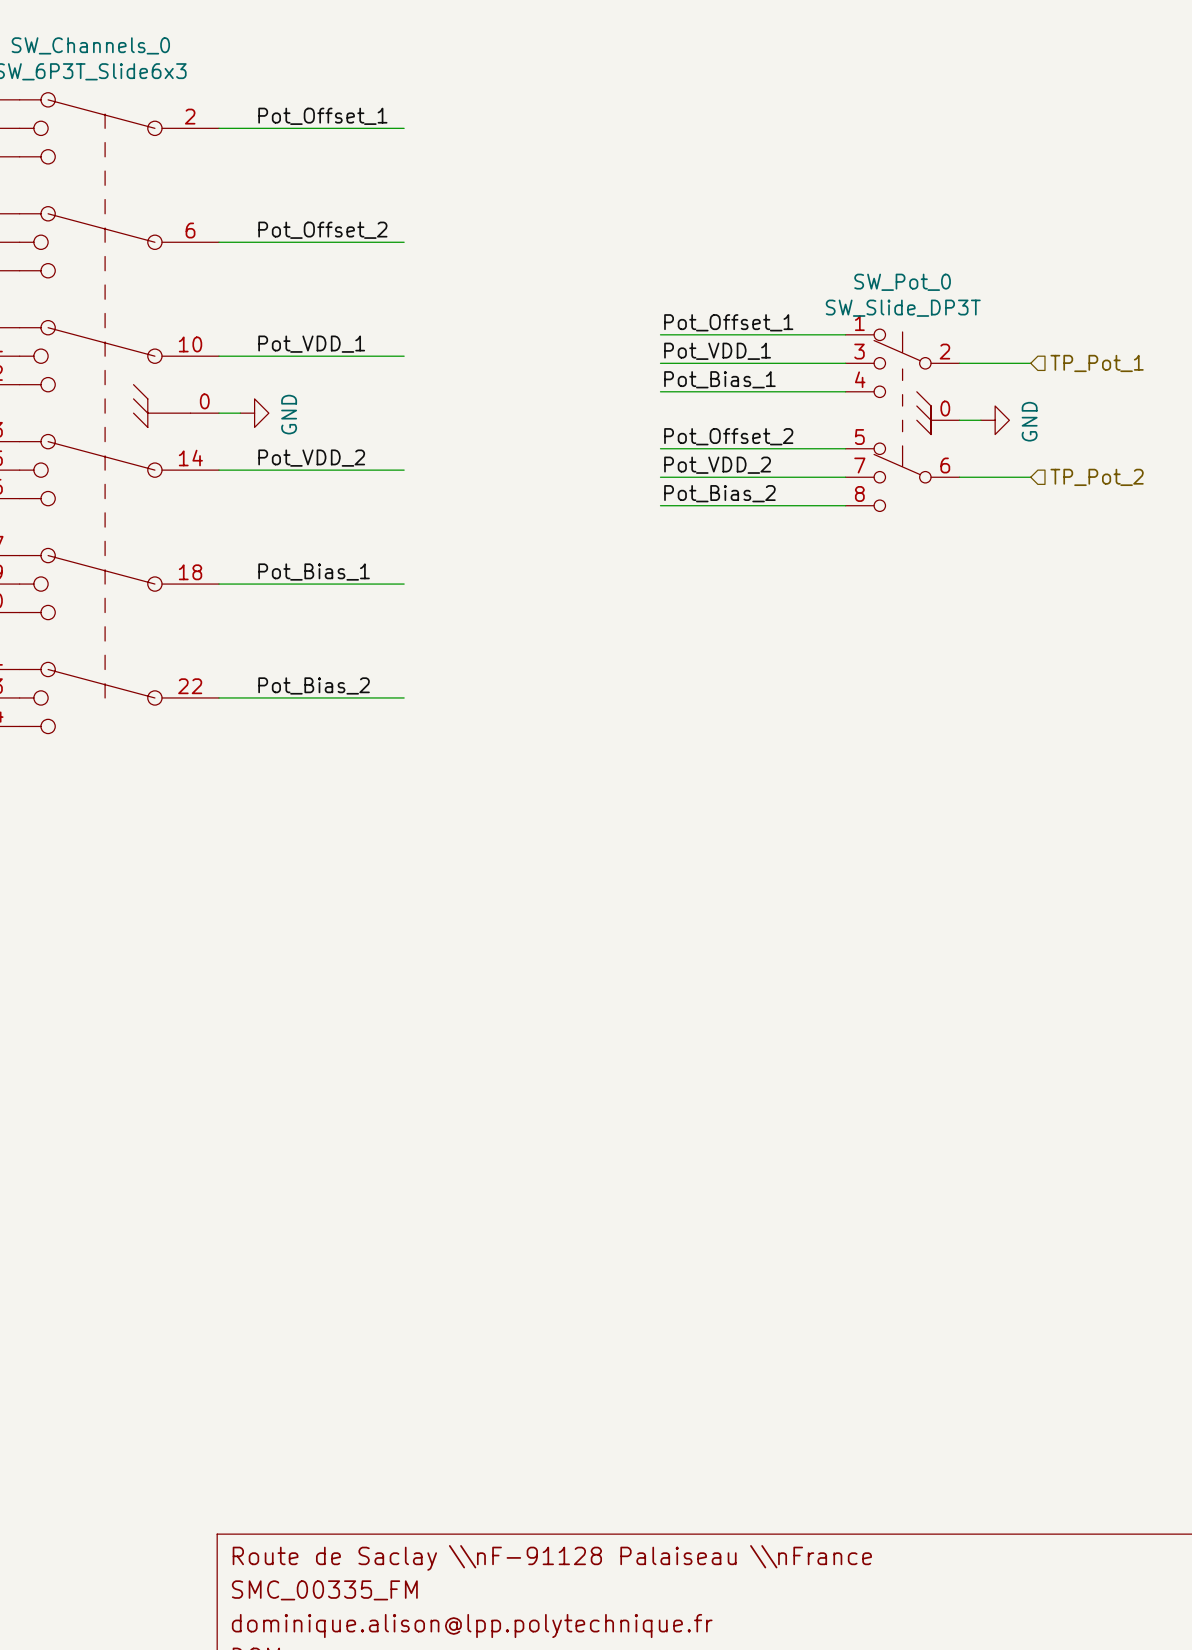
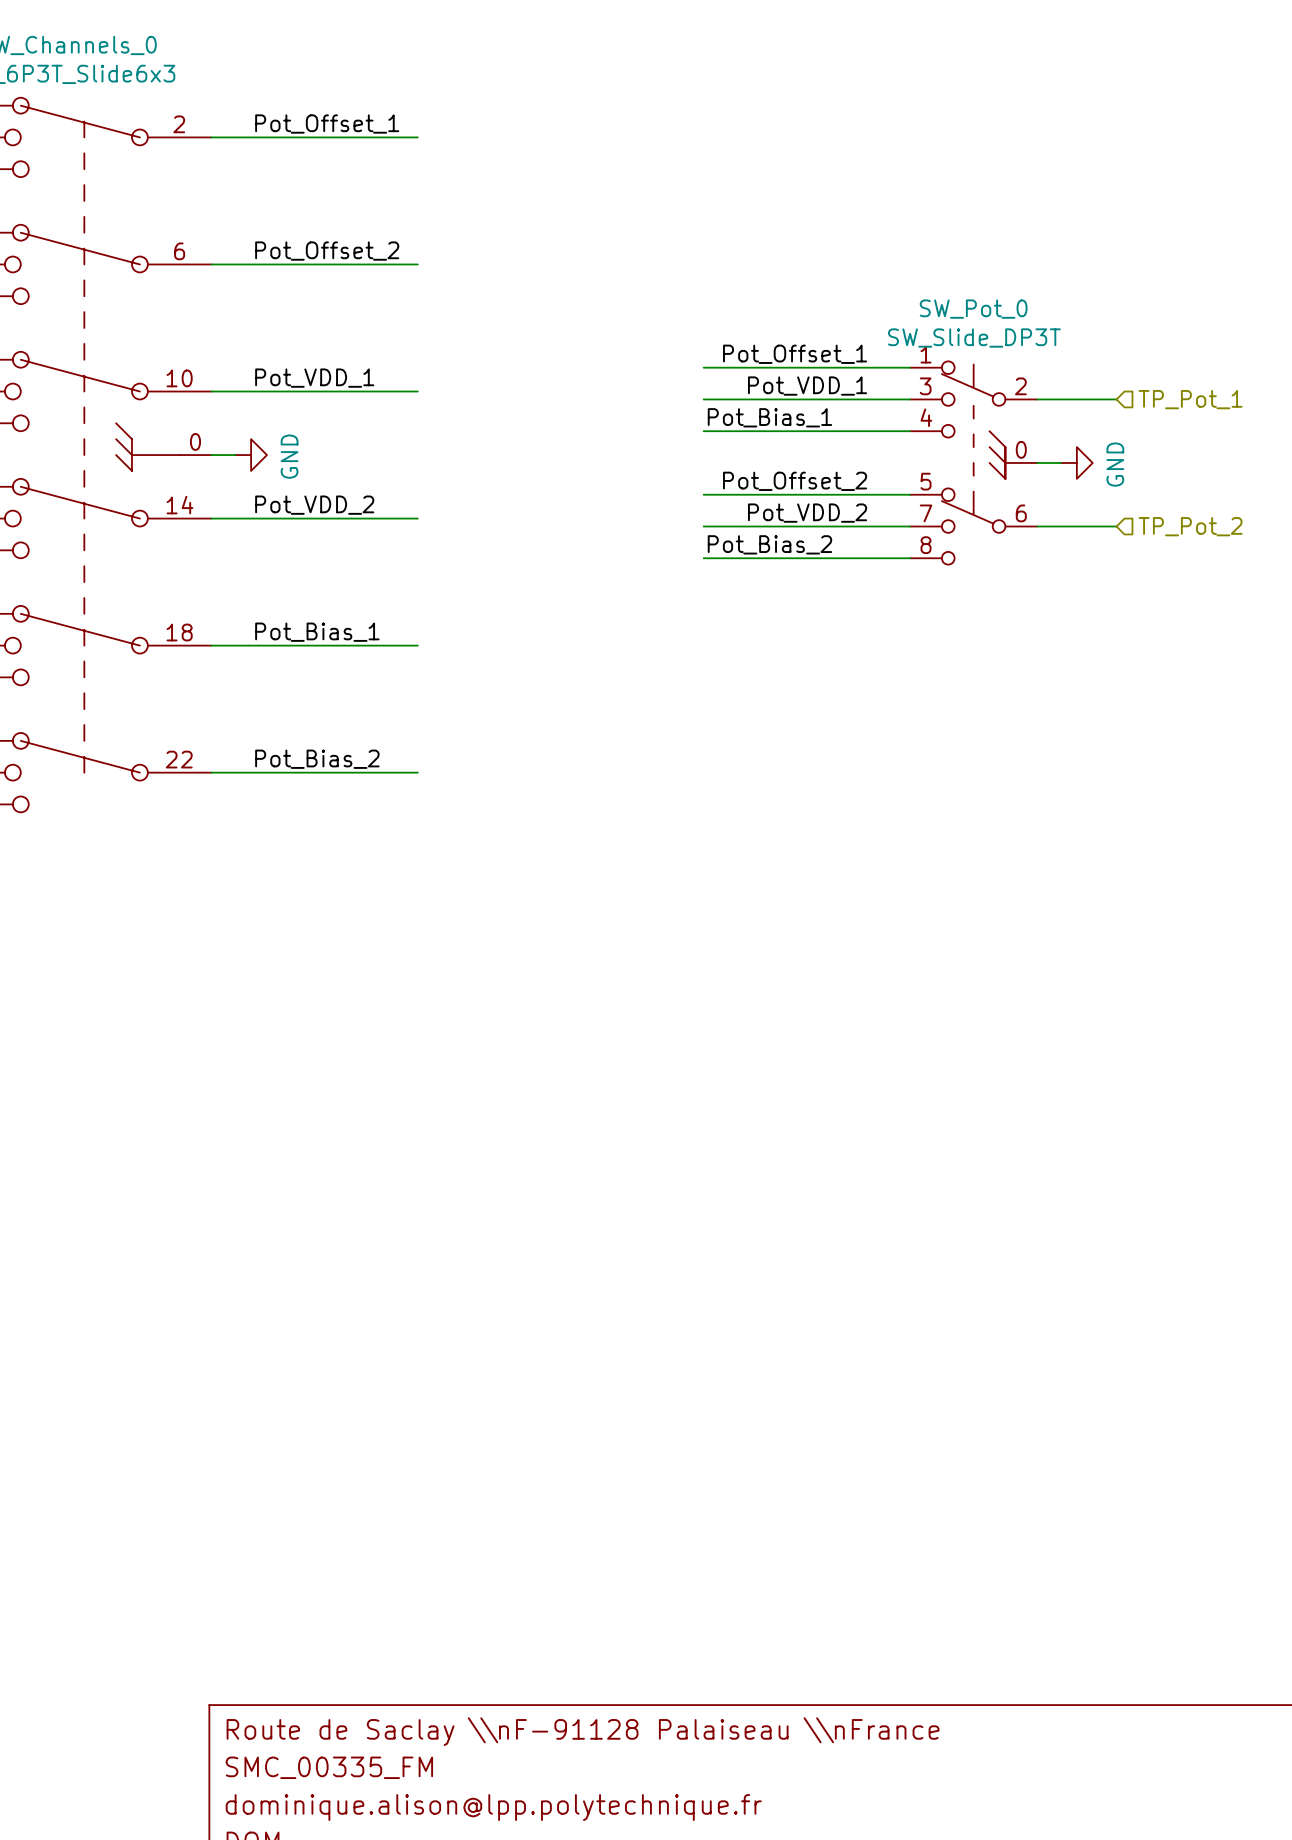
label position: Pot_Offset_1 (728, 322) -> Pot_Offset_1 (795, 354)
label position: Pot_VDD_1 (717, 351) -> Pot_VDD_1 (807, 386)
label position: Pot_Offset_2 (728, 436) -> Pot_Offset_2 (795, 481)
label position: Pot_VDD_2 (717, 465) -> Pot_VDD_2 (807, 513)

